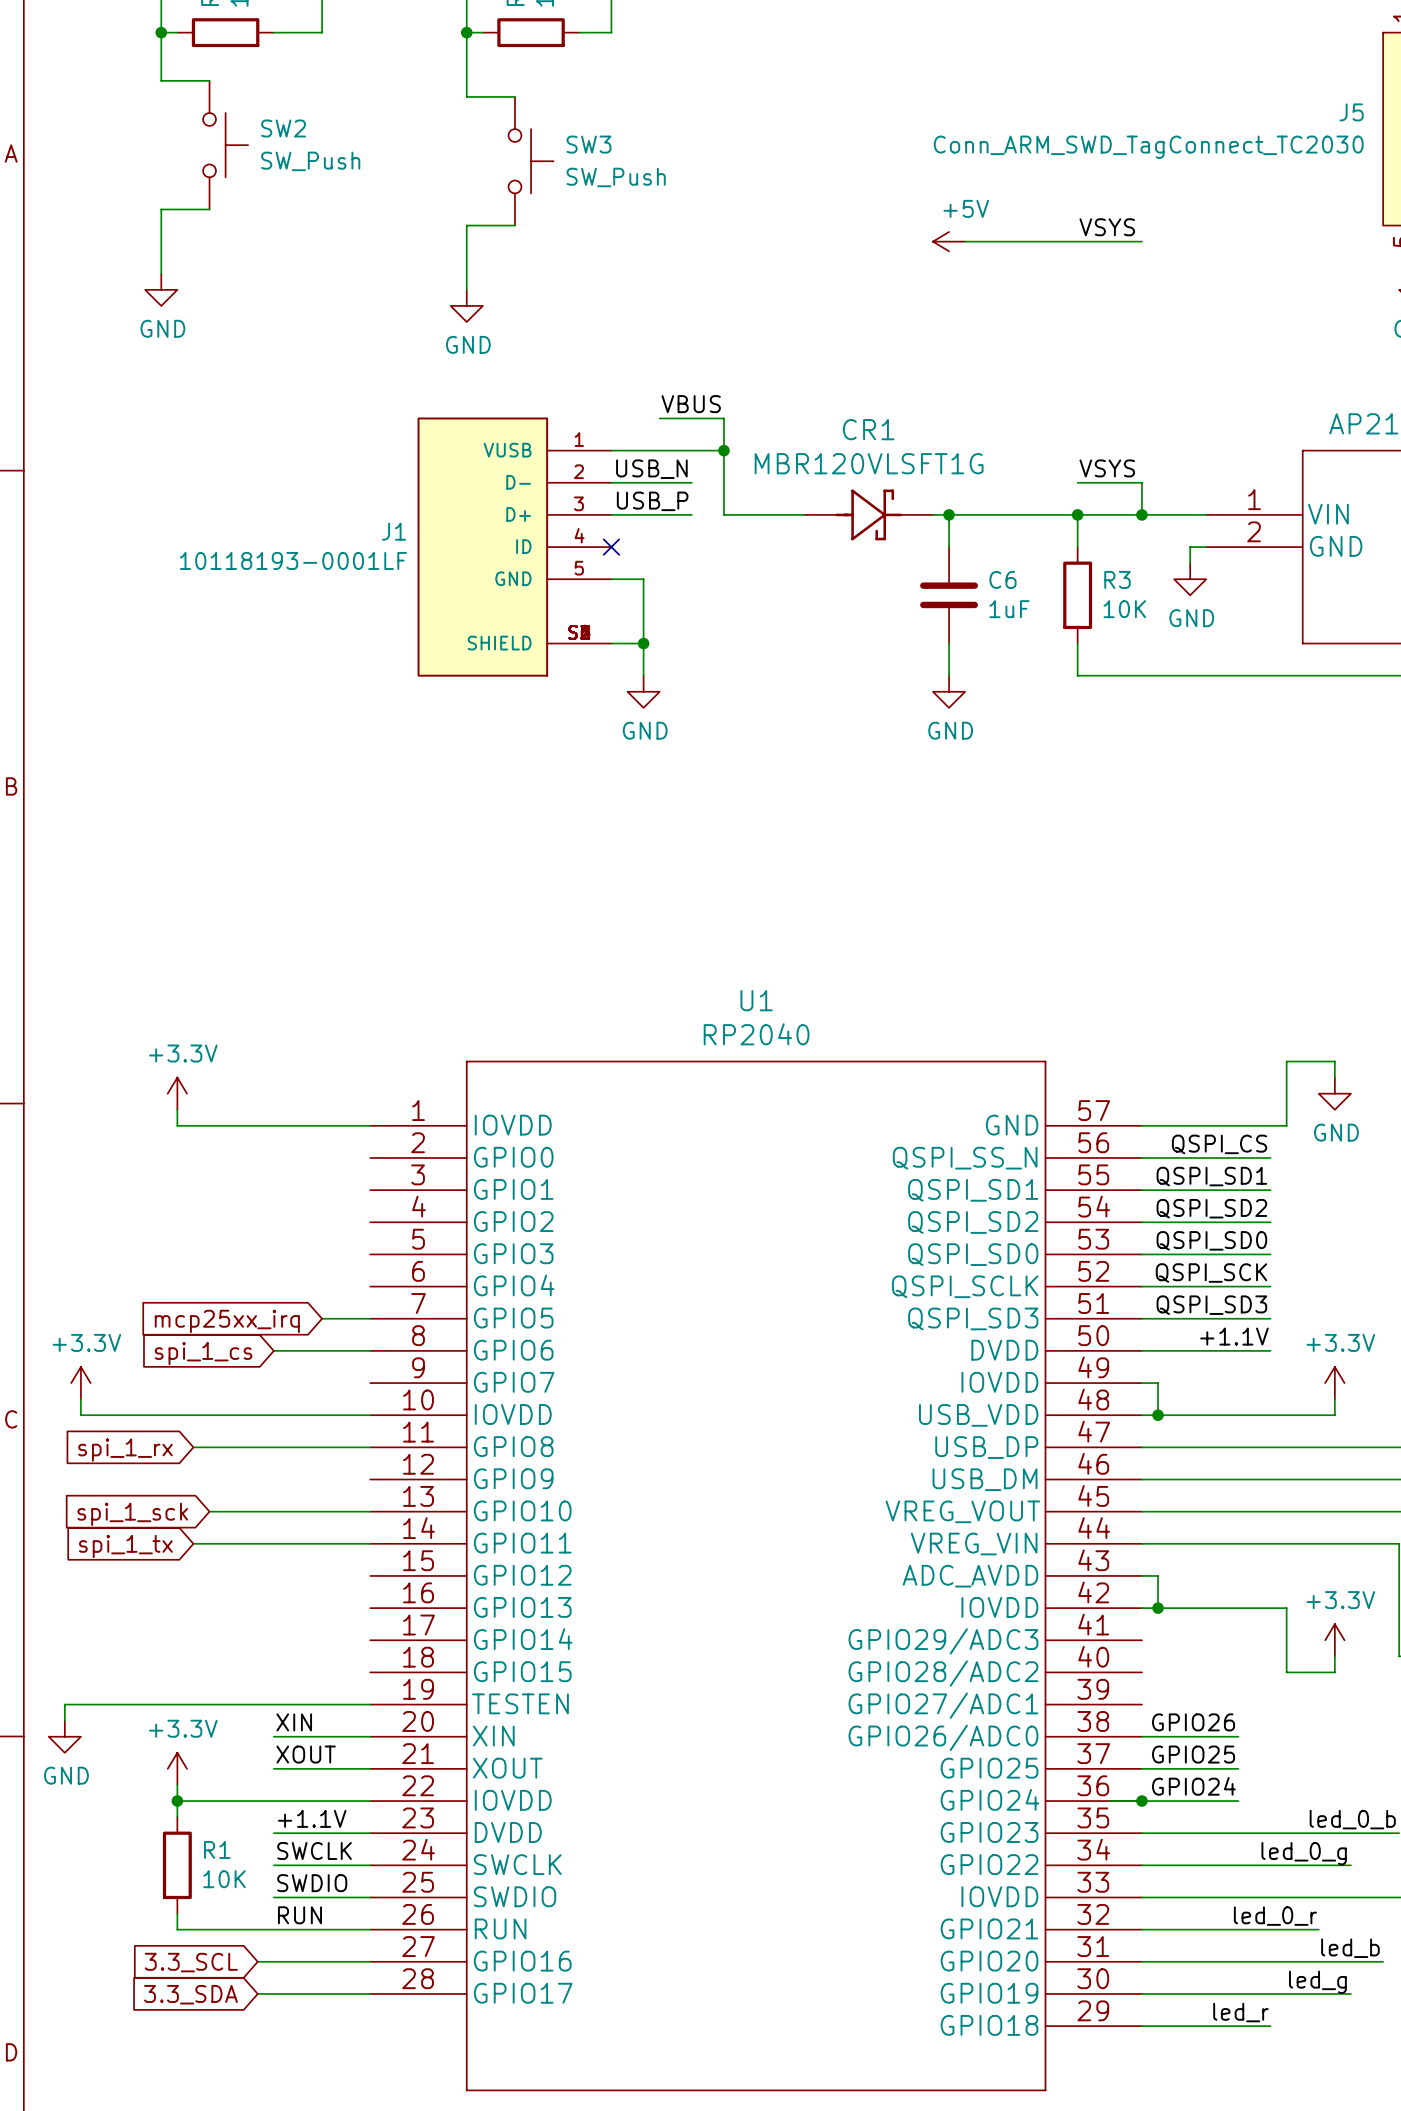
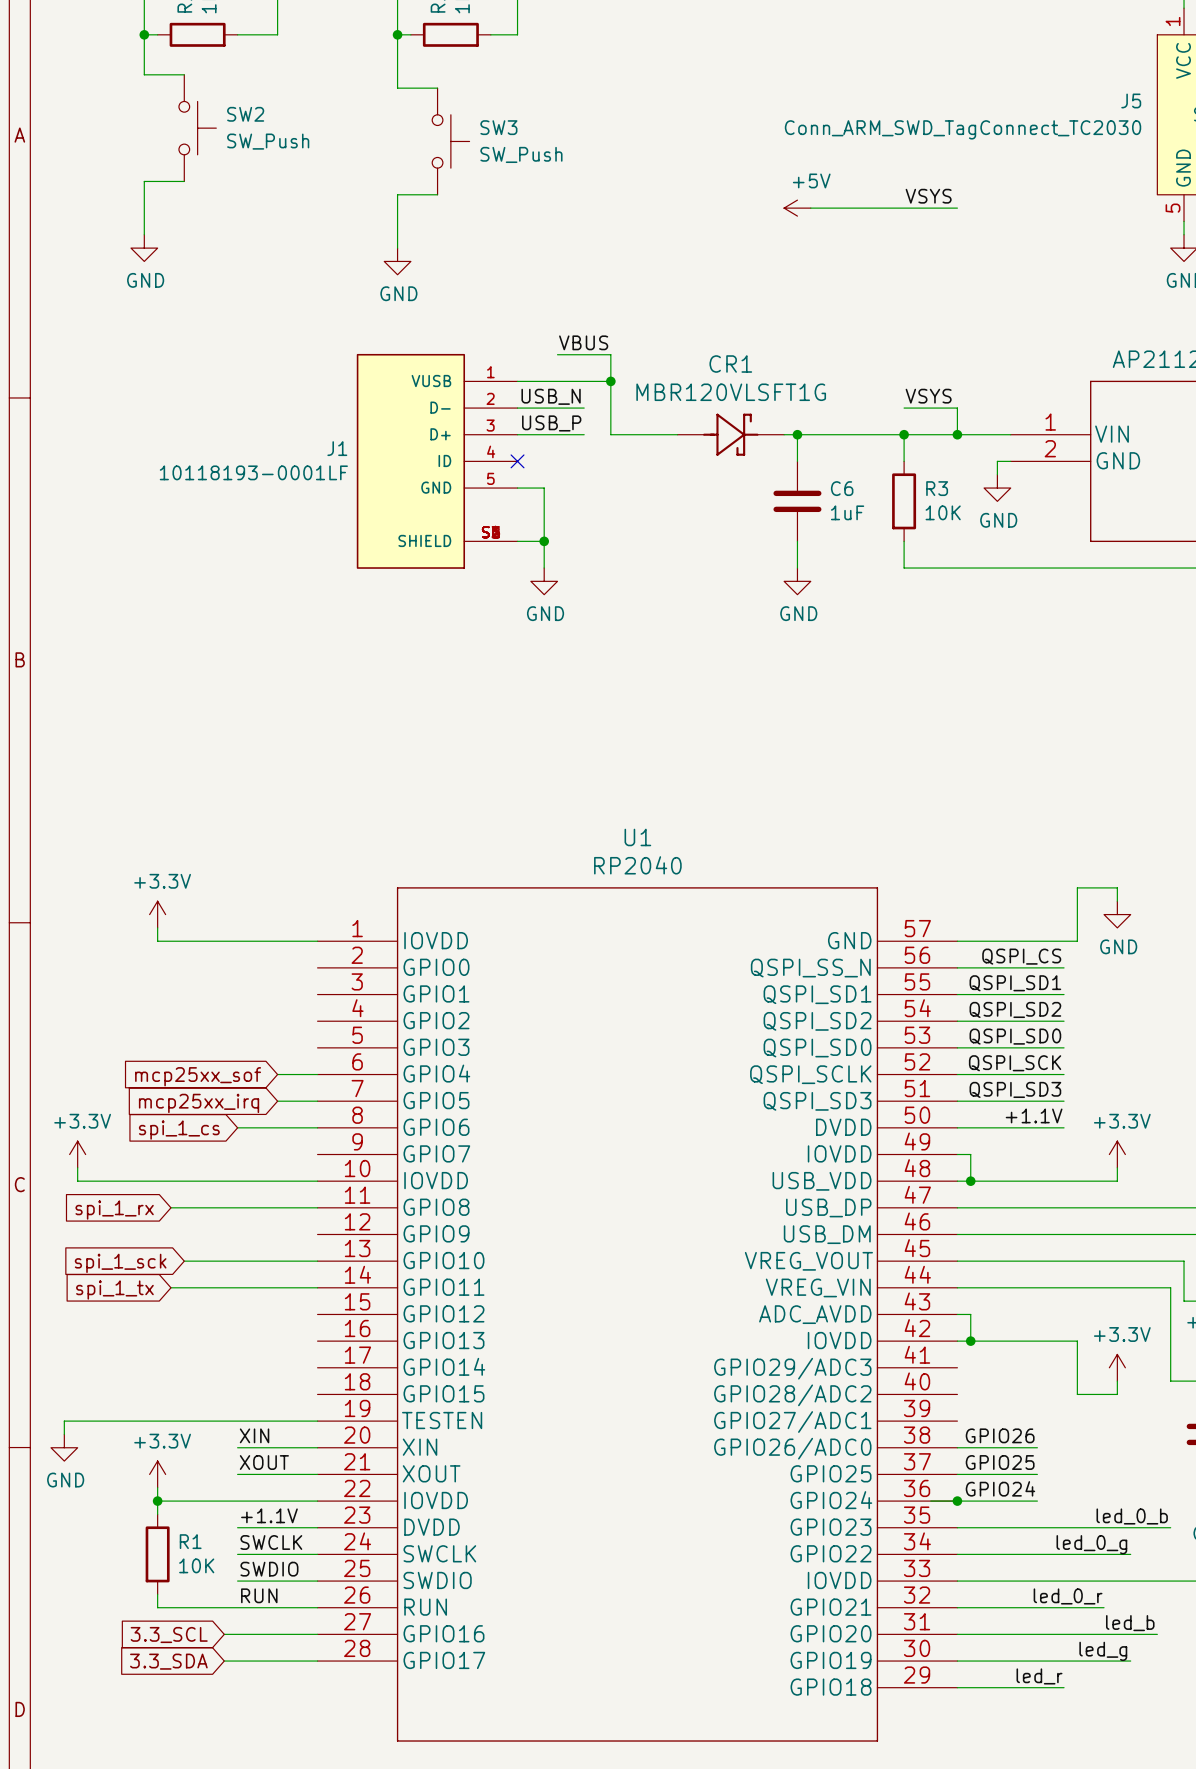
wire: none -> (277, 1074) (317, 1074)
global label: none -> mcp25xx_sof (198, 1076)

